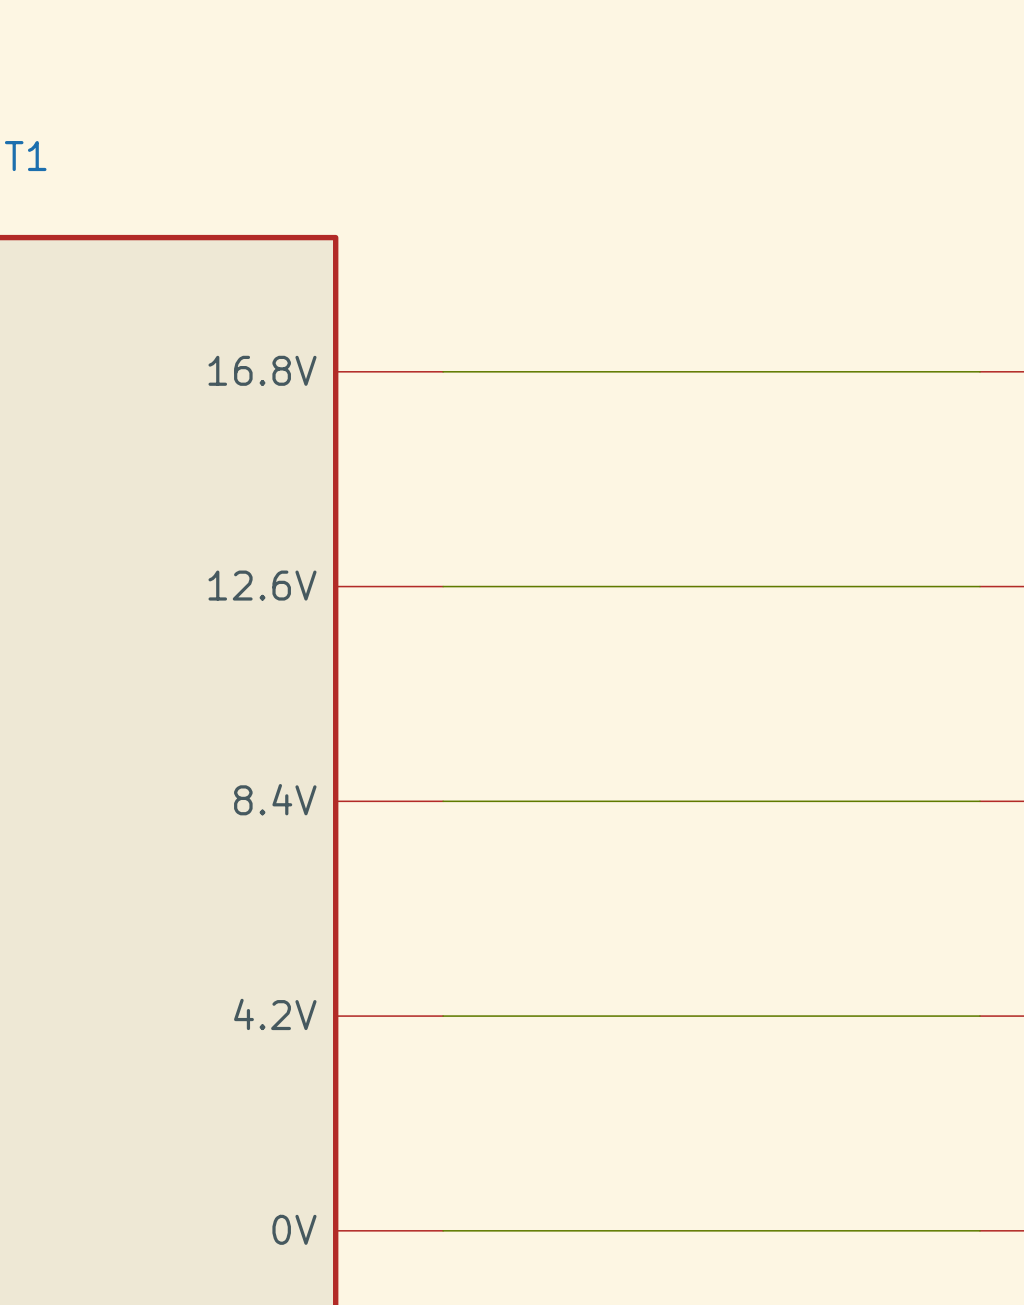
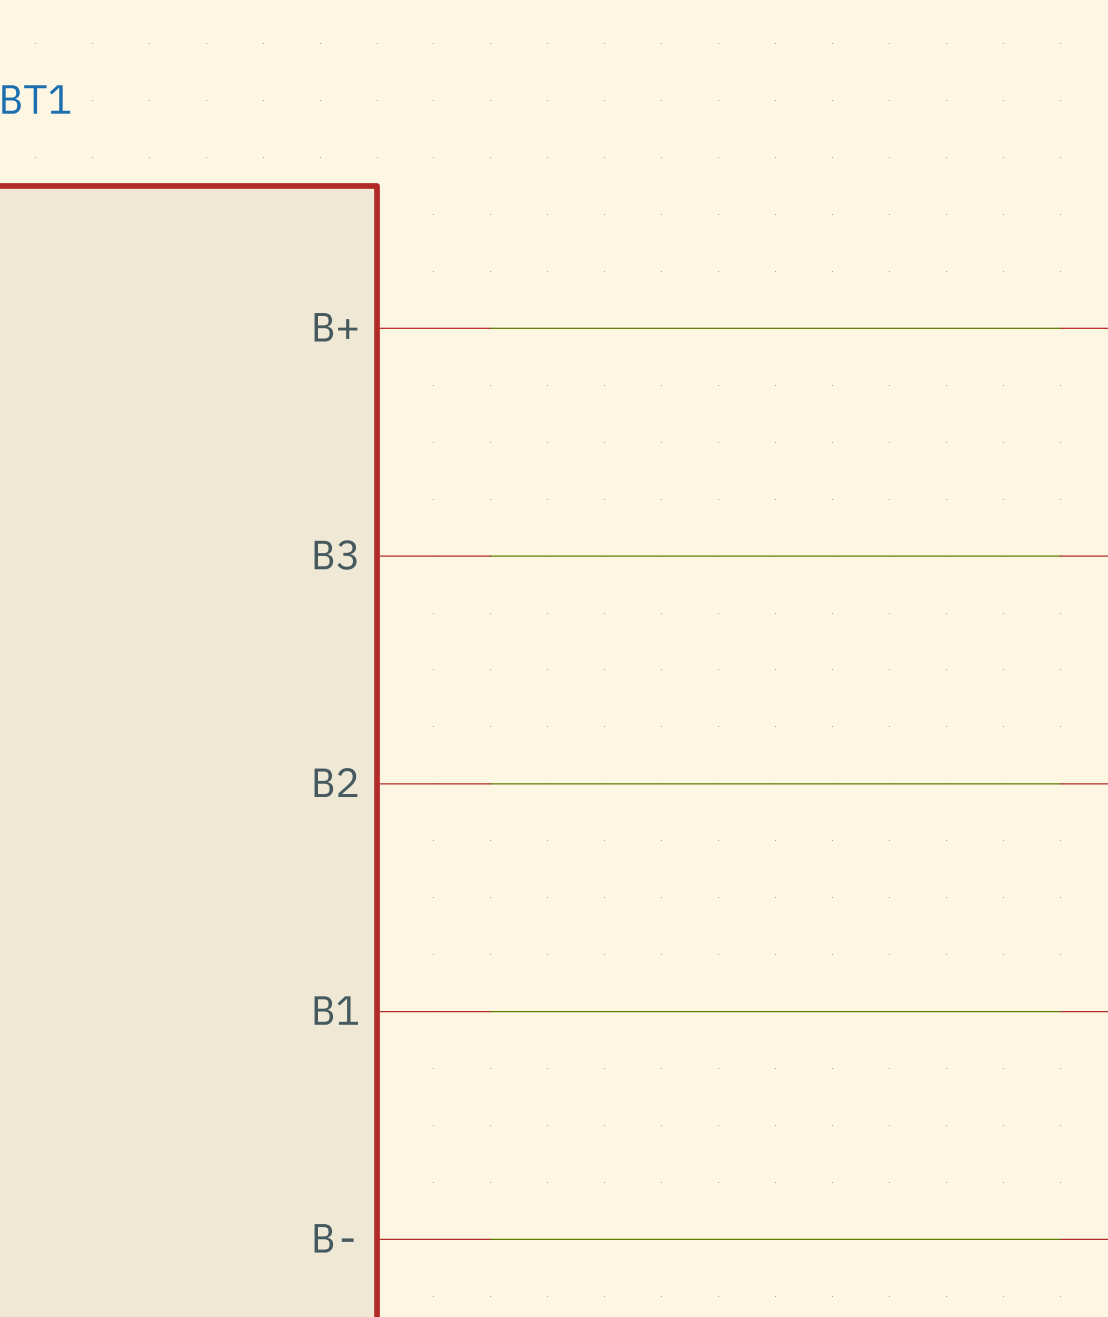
BT1 pin name: 16.8V (262, 370) -> B+ (335, 327)
BT1 pin name: 12.6V (262, 585) -> B3 (335, 555)
BT1 pin name: 8.4V (275, 799) -> B2 (335, 782)
BT1 pin name: 4.2V (275, 1014) -> B1 (336, 1010)
BT1 pin name: 0V (294, 1229) -> B- (334, 1238)

